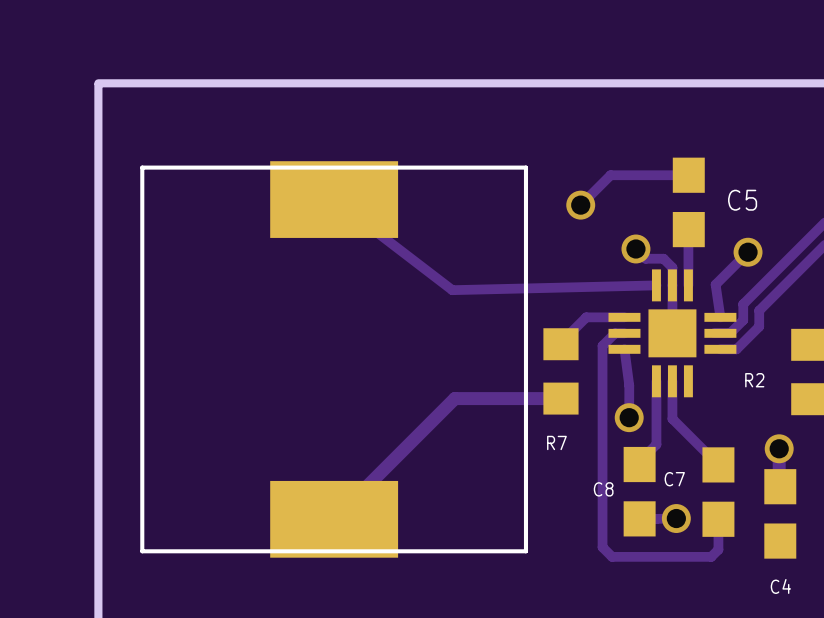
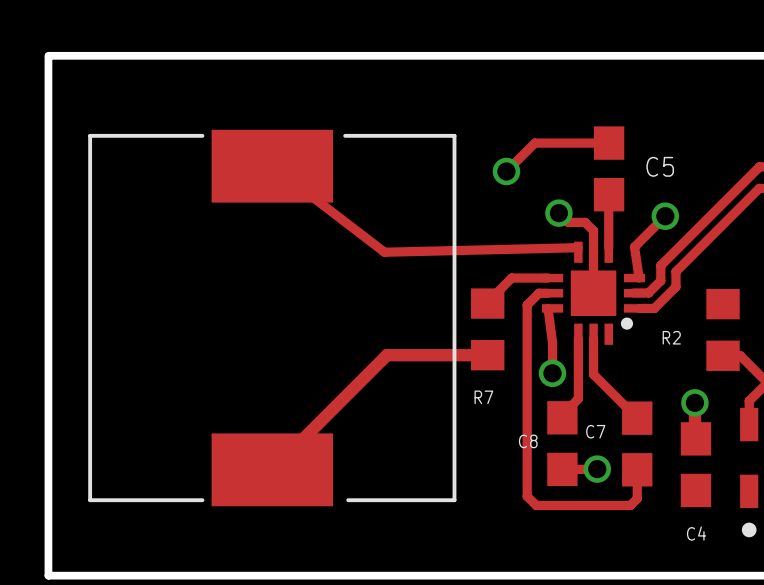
part footprint: [140, 161, 529, 558] -> [88, 129, 457, 507]
part footprint: [608, 269, 737, 398] -> [541, 241, 646, 345]

